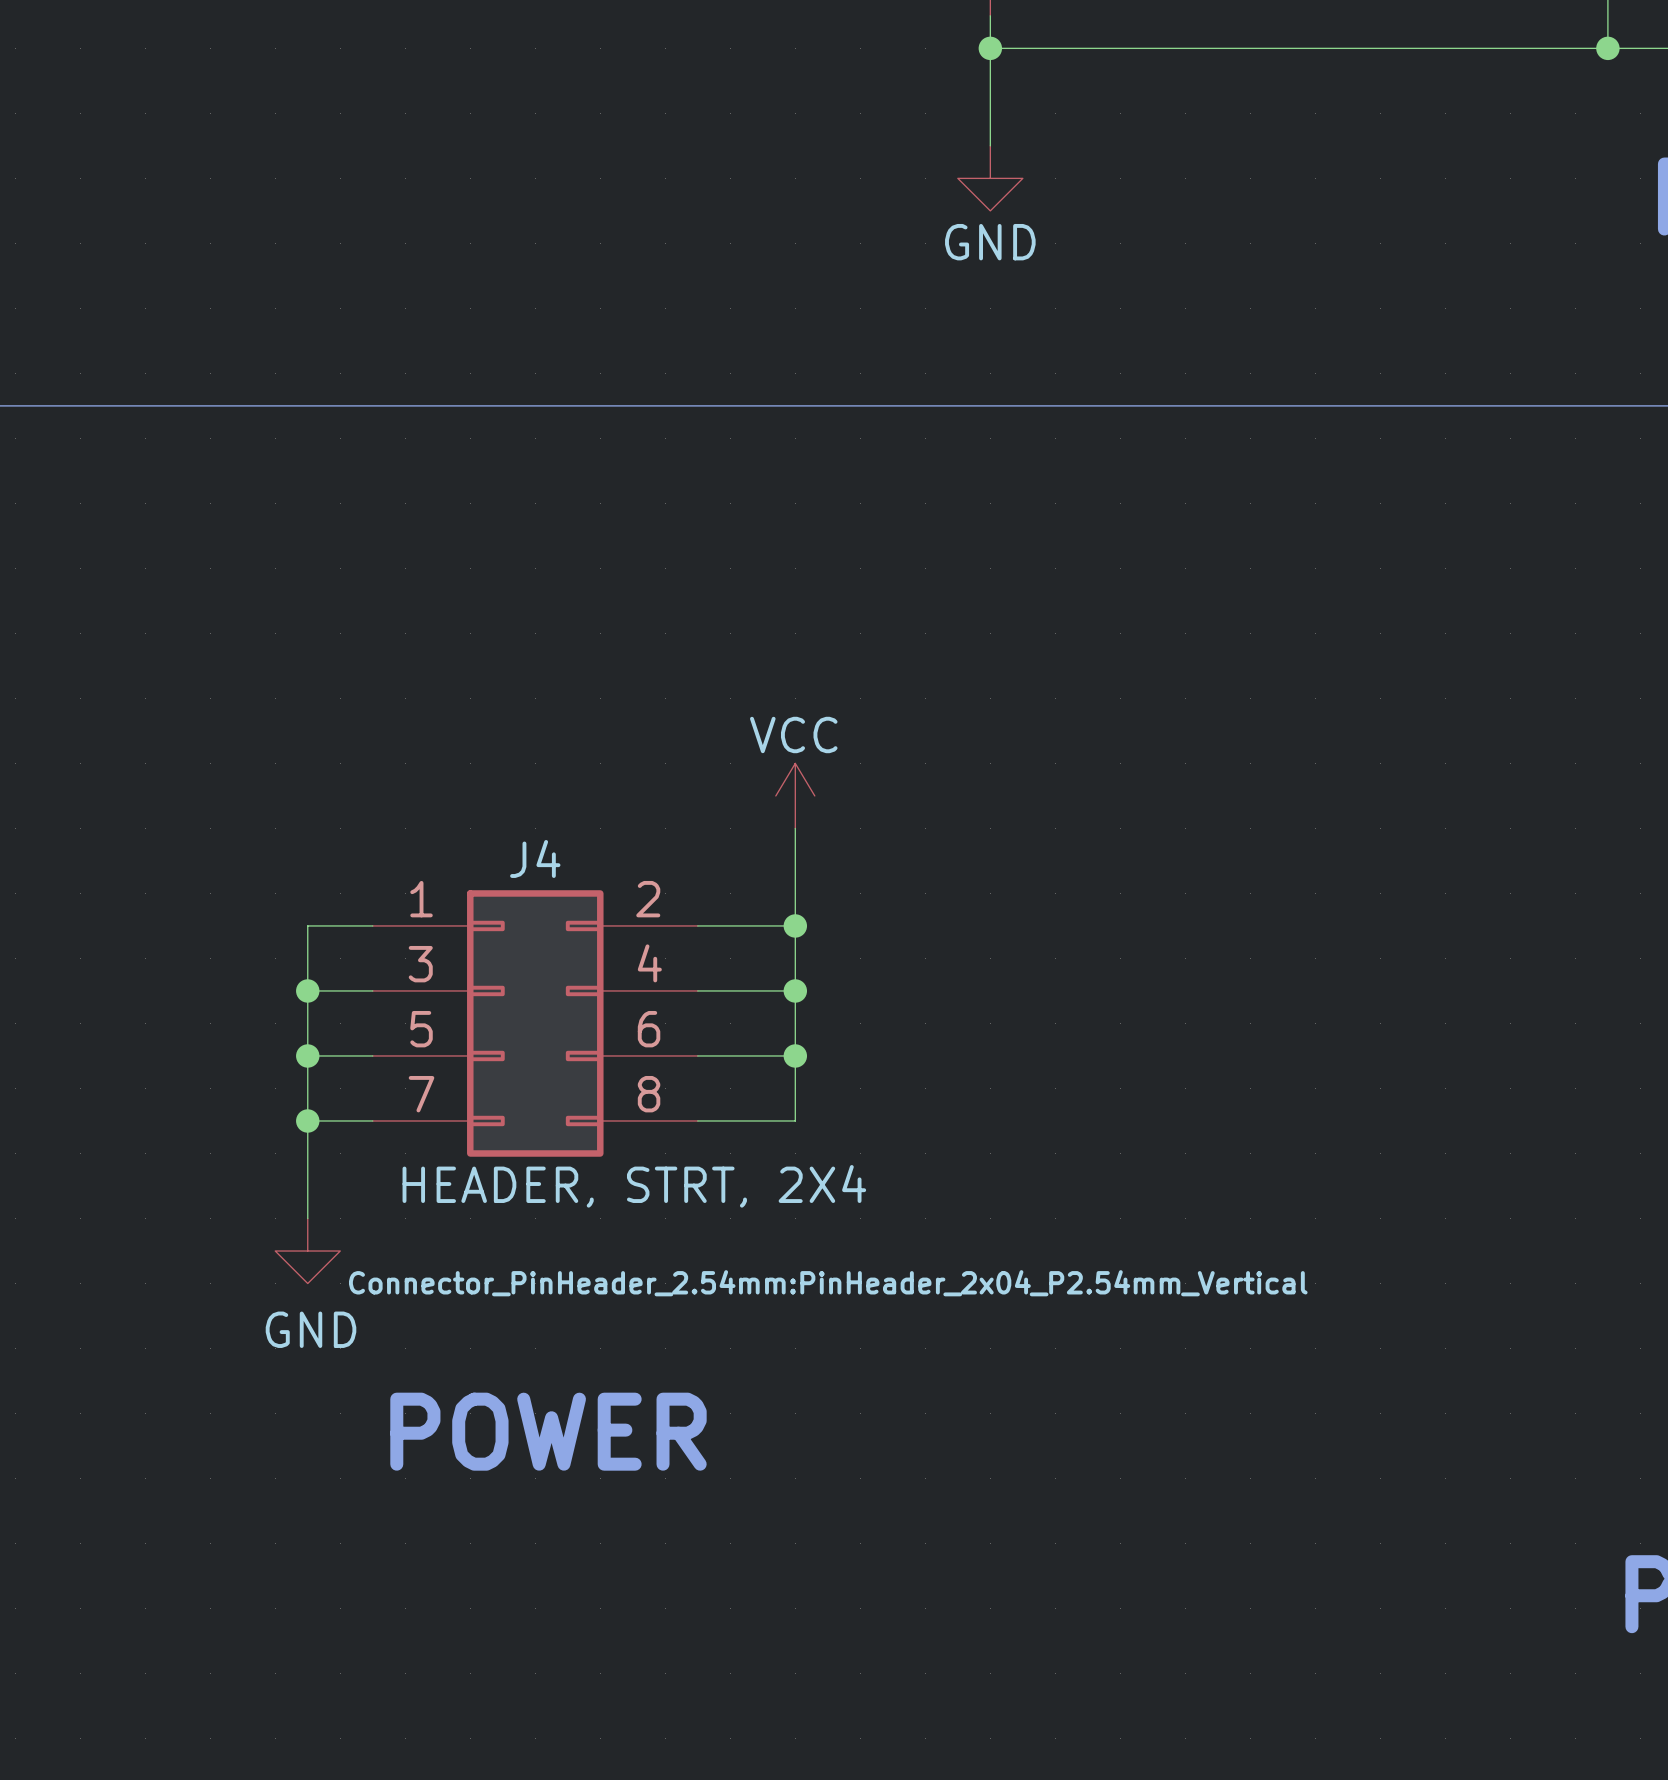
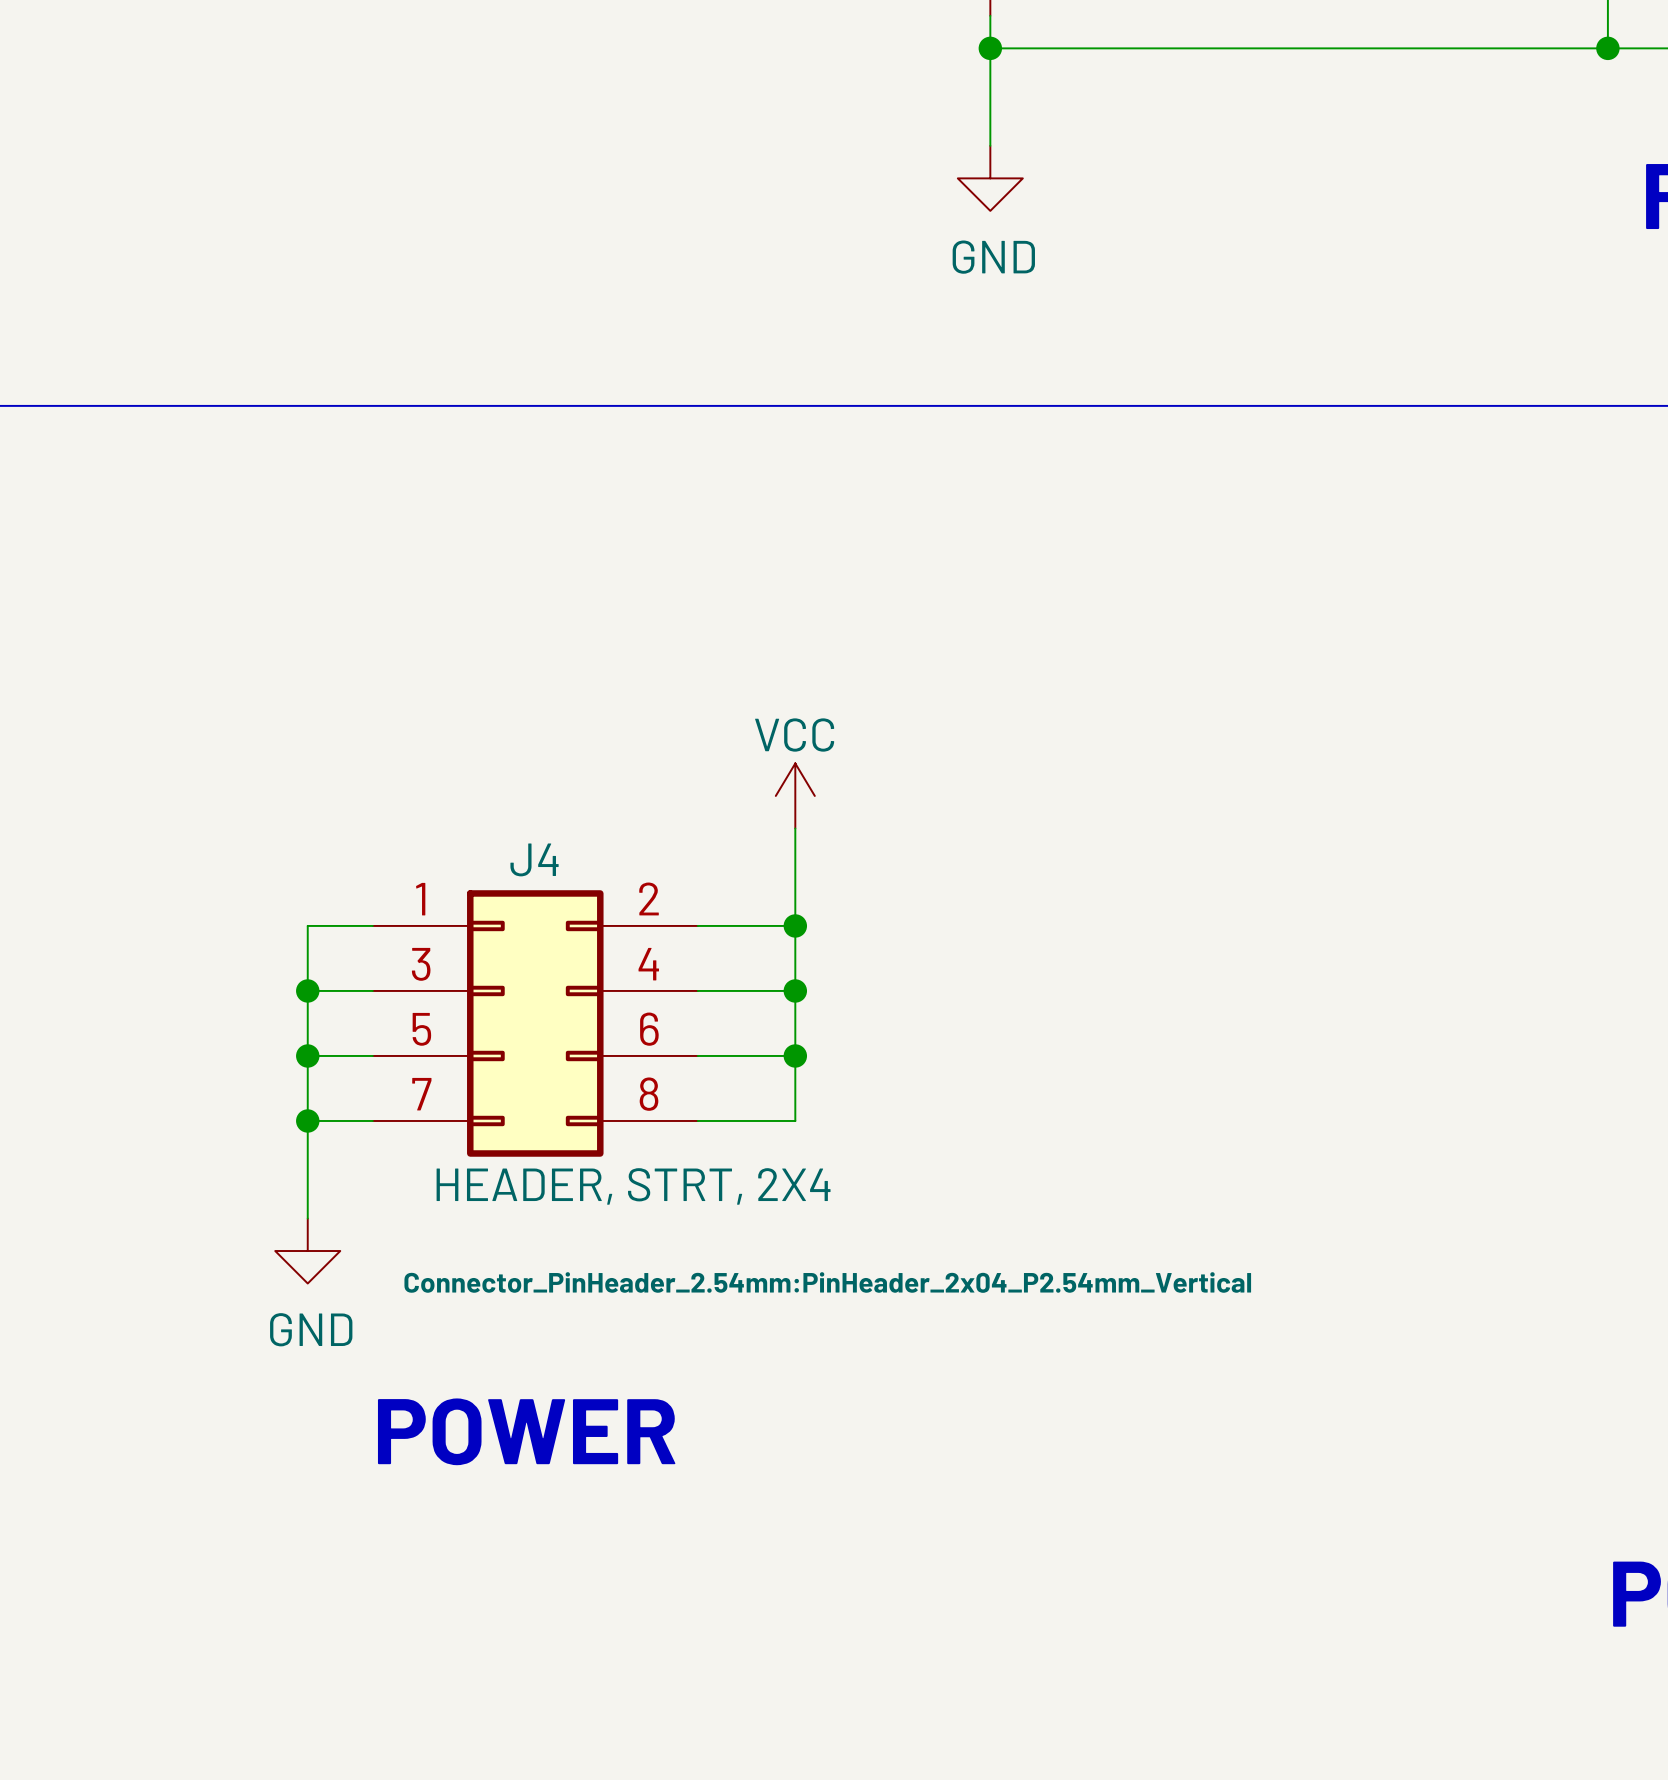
power symbol text position: GND (990, 242) -> GND (993, 257)

